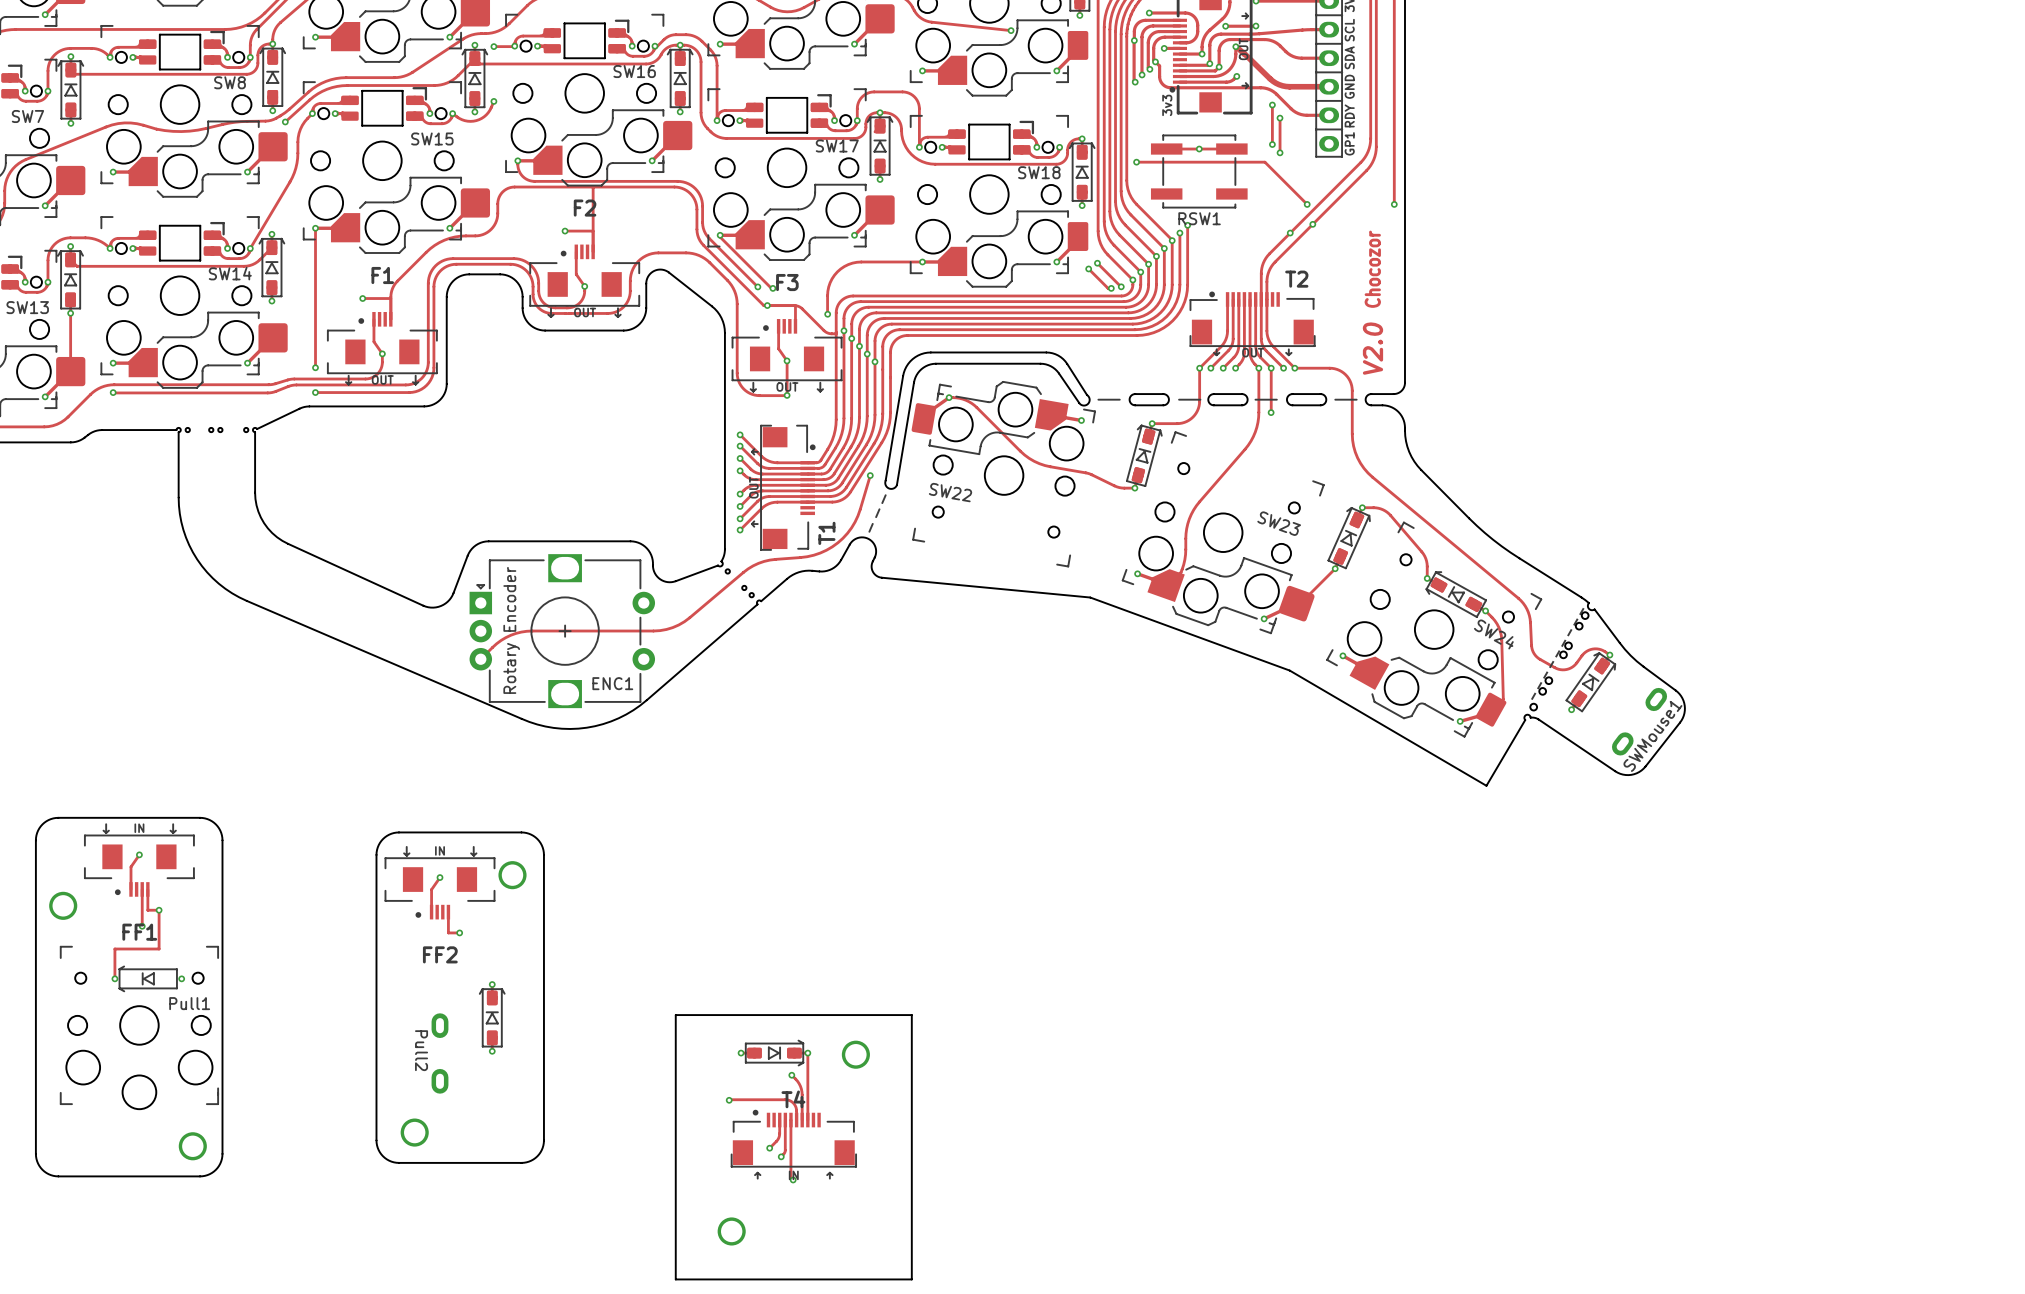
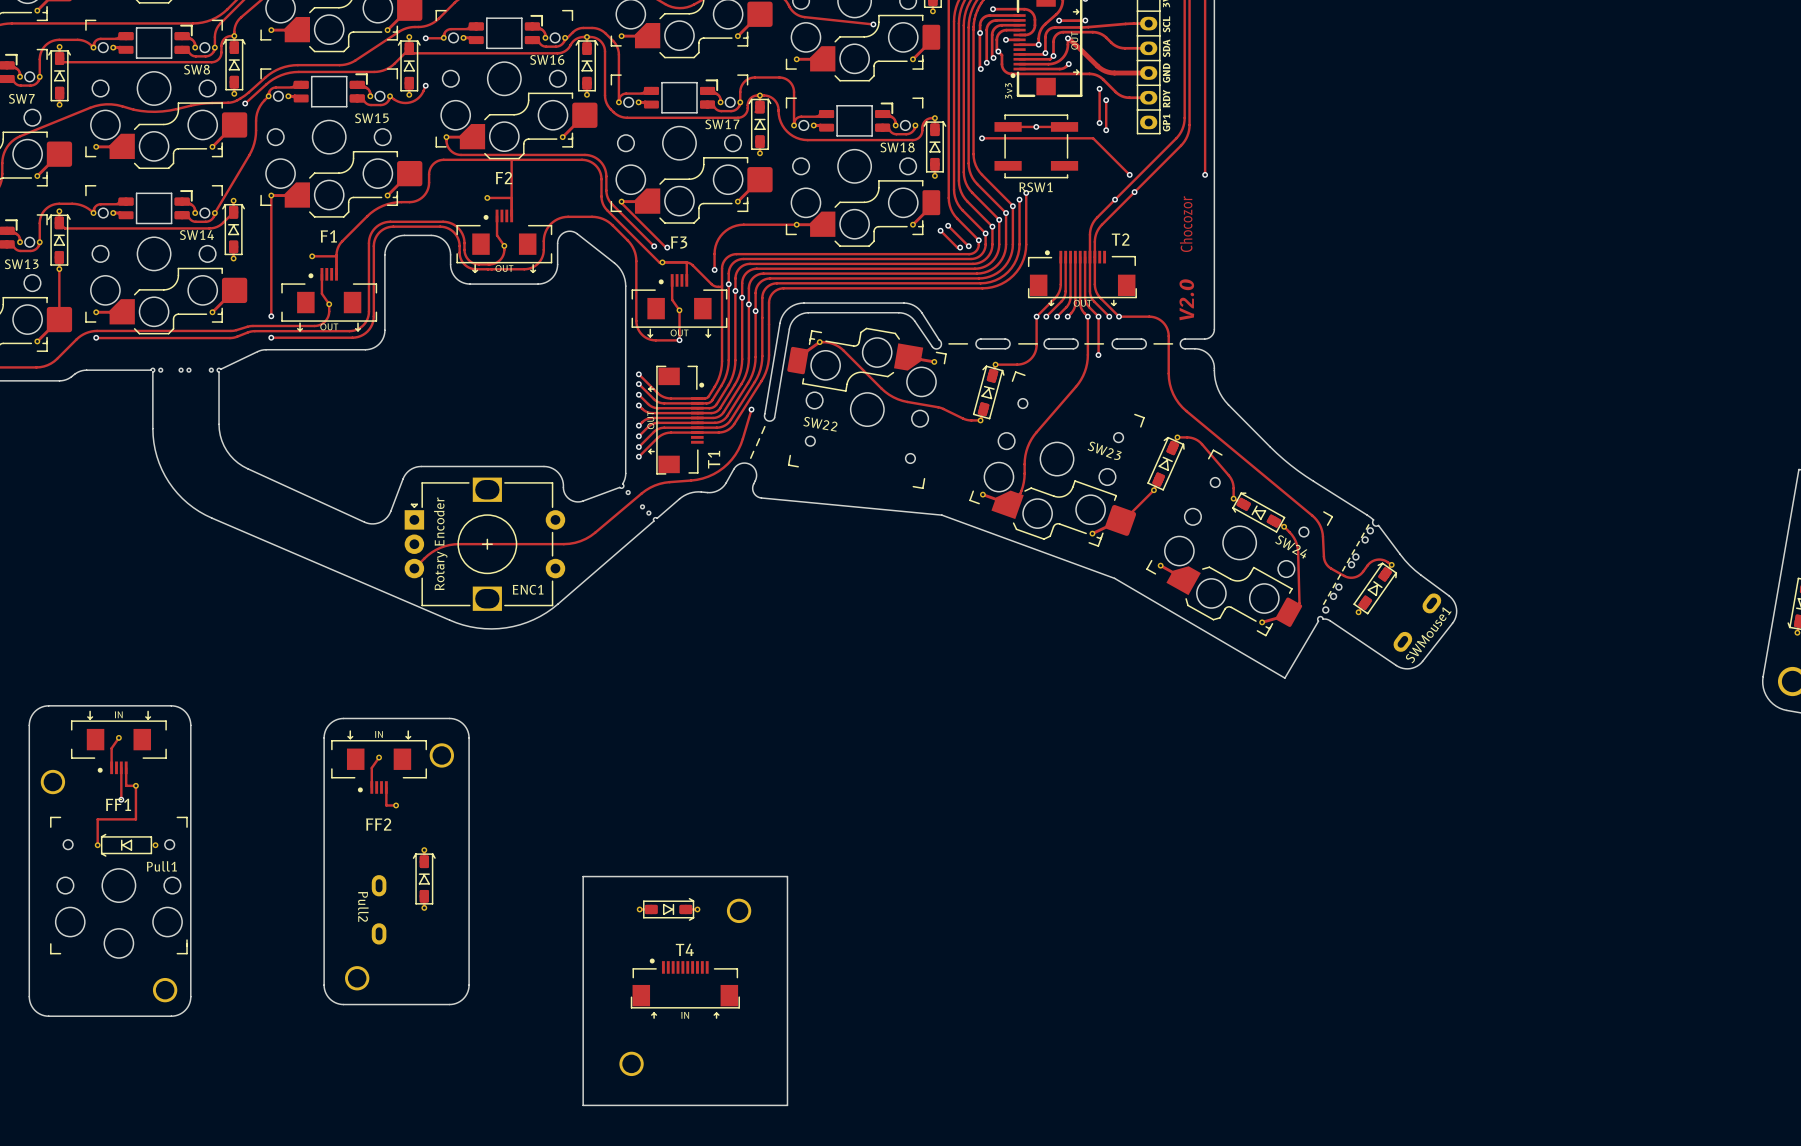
track: (807, 1053) (807, 1120) -> none
track: (791, 1075) (801, 1089) (802, 1120) -> none
via: (791, 1075) -> none
track: (729, 1100) (788, 1100) (795, 1106) (796, 1120) -> none
via: (729, 1100) -> none
track: (779, 1120) (779, 1136) (769, 1148) -> none
track: (785, 1120) (785, 1150) (781, 1156) -> none
track: (790, 1120) (790, 1177) (793, 1179) -> none
via: (769, 1148) -> none
via: (781, 1156) -> none
via: (793, 1179) -> none

